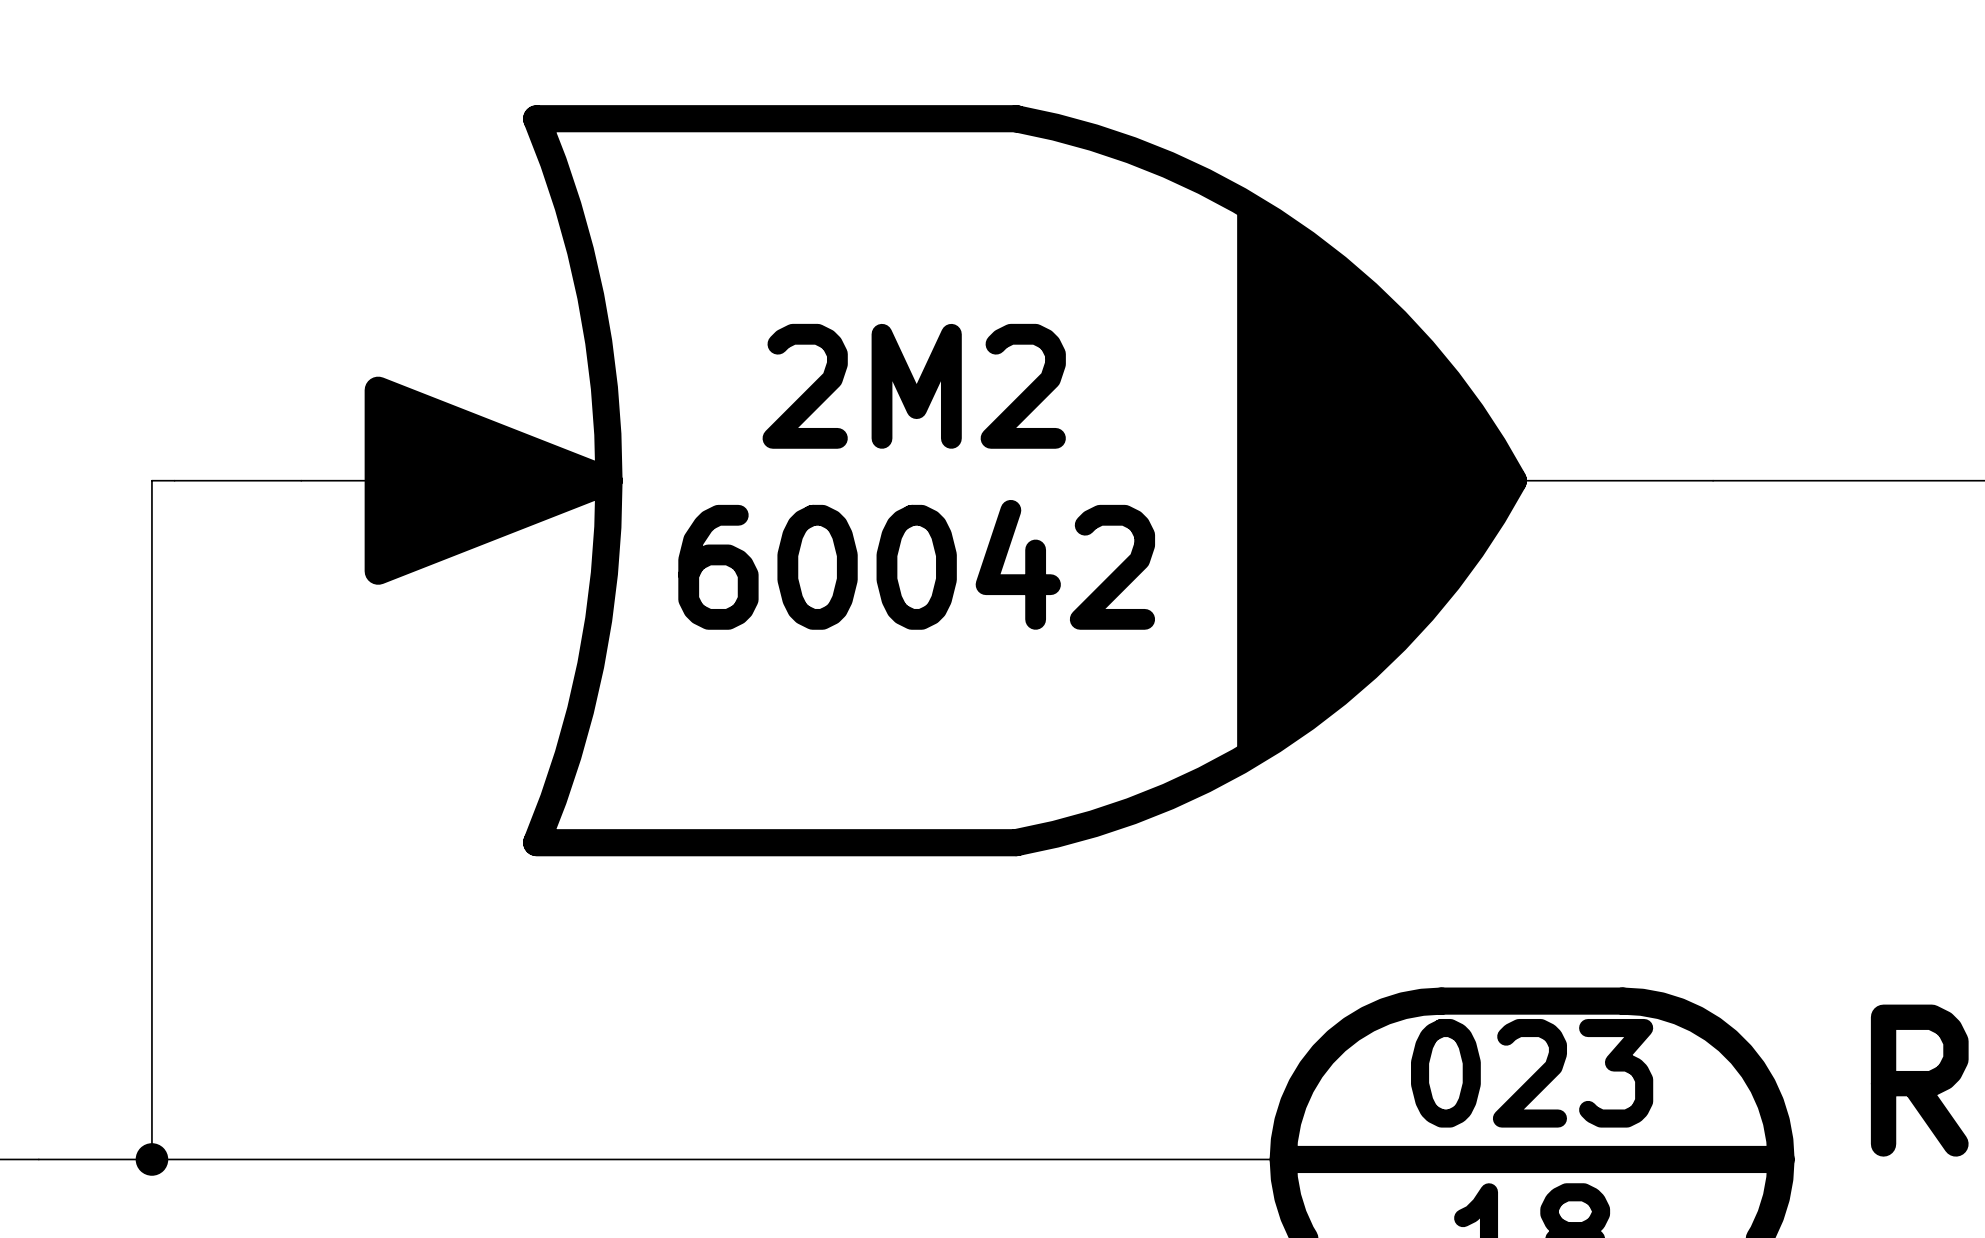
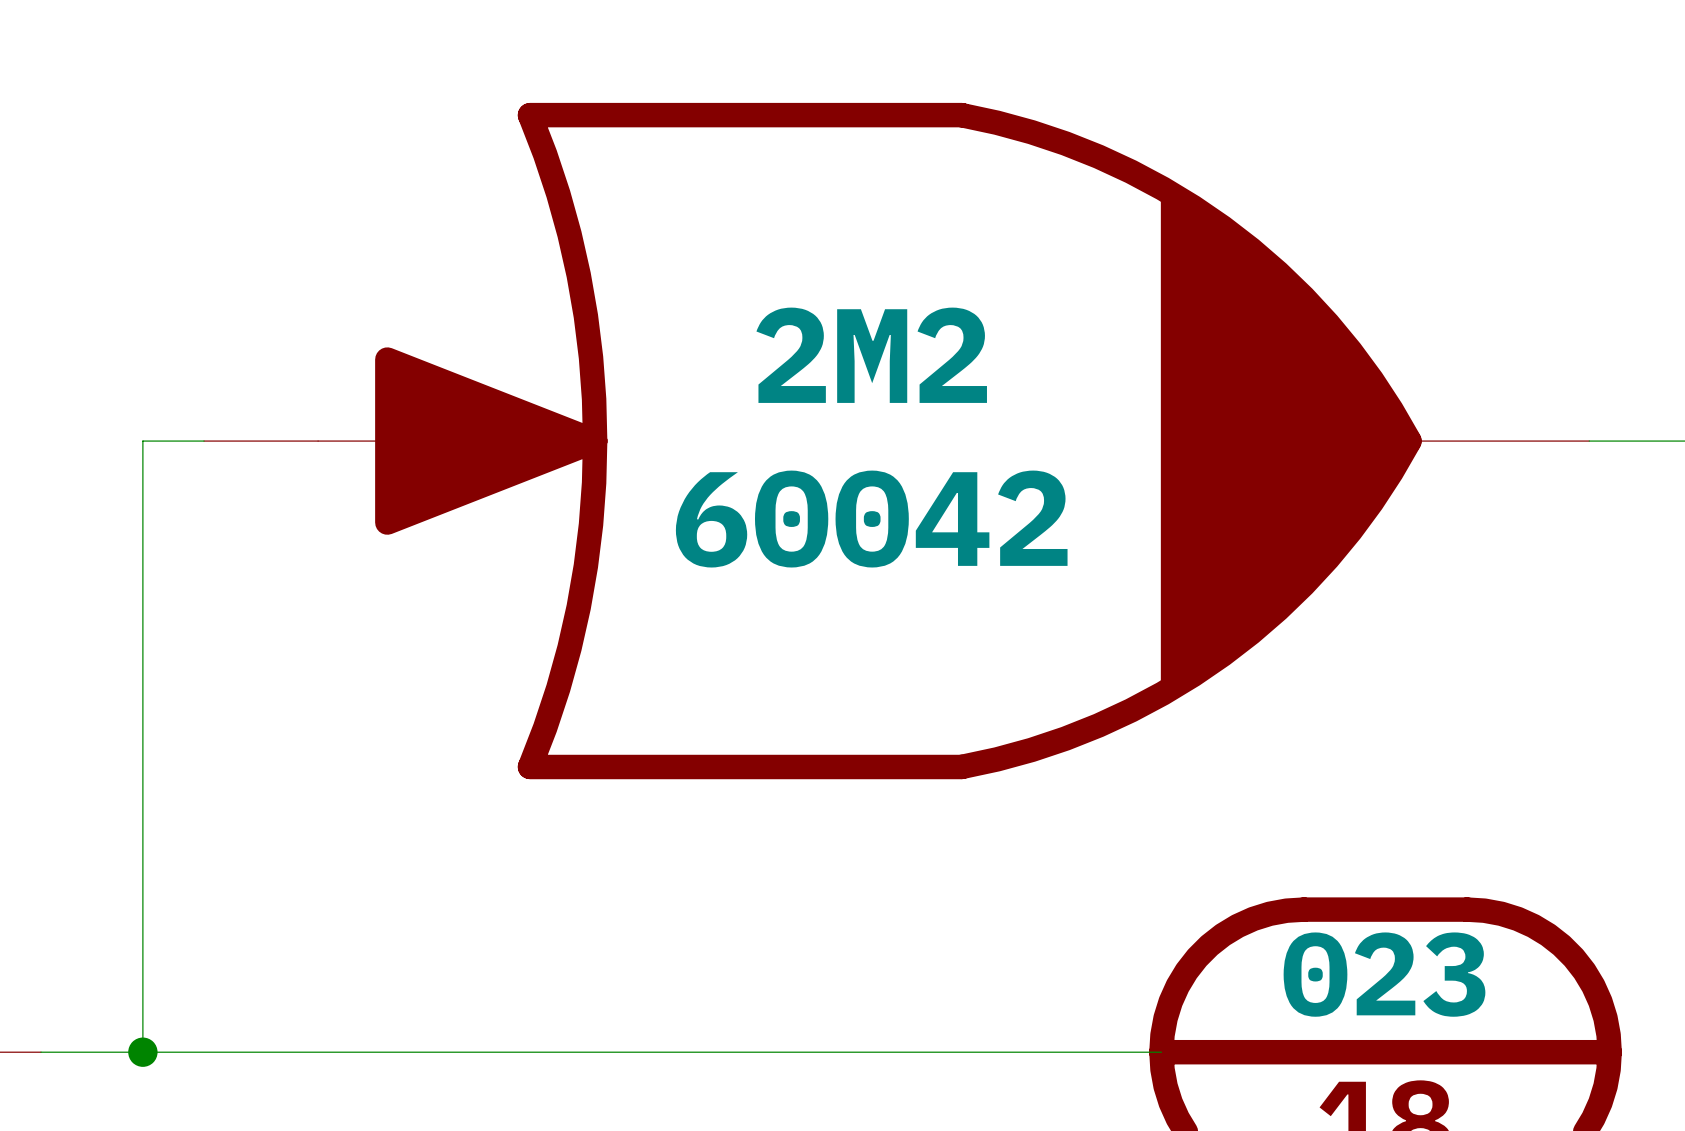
part position: (943, 480) -> (896, 441)

